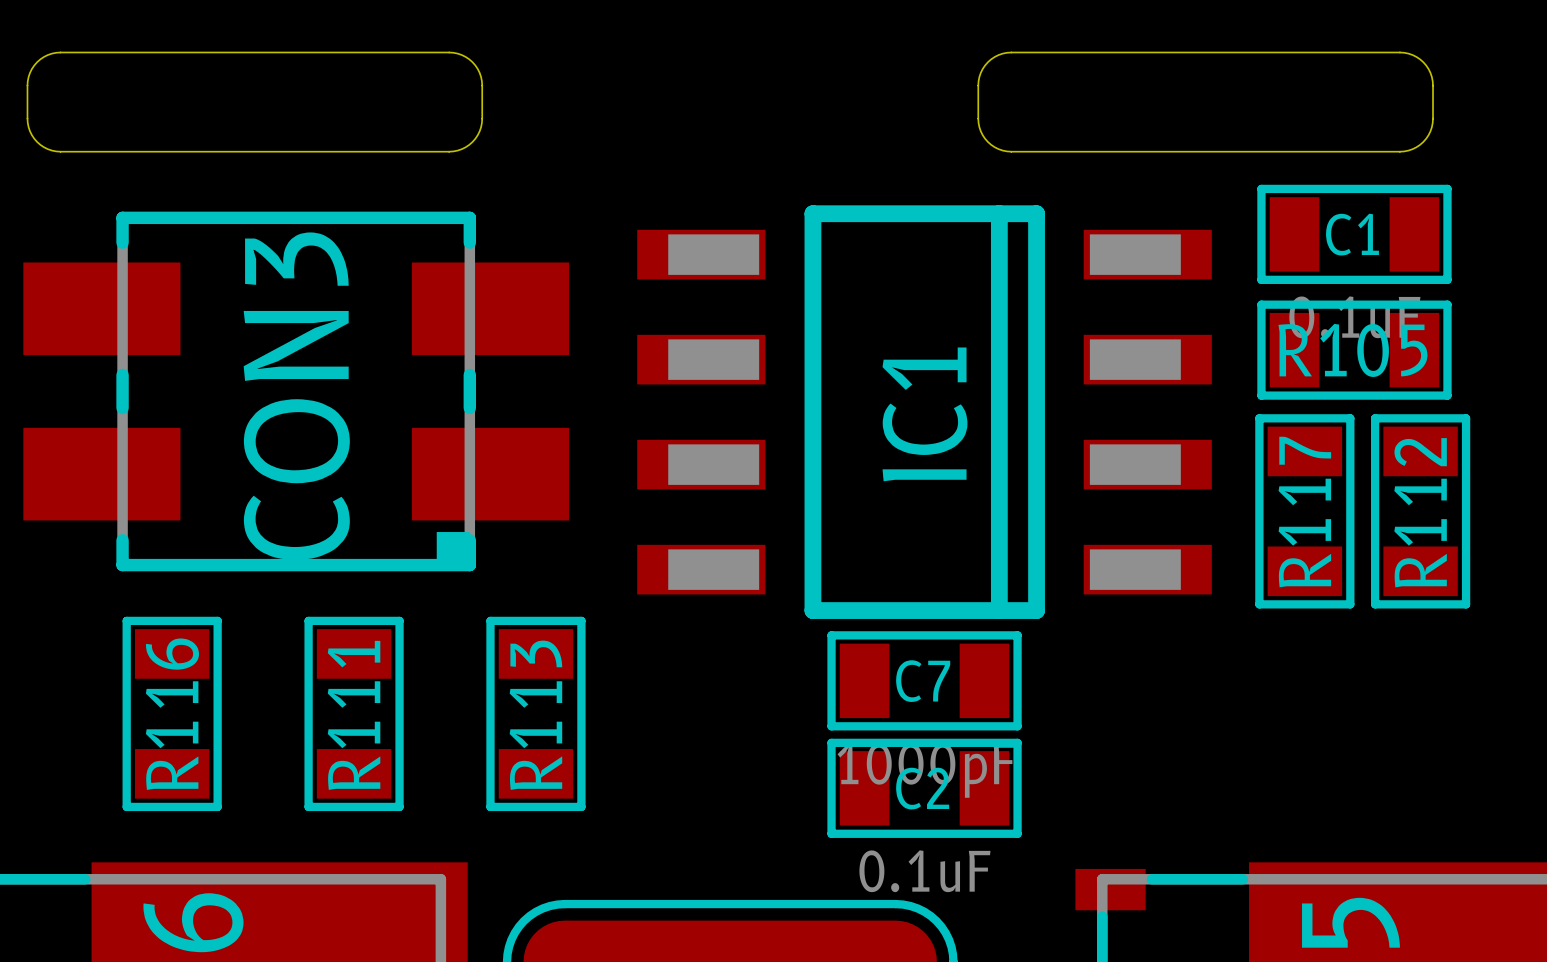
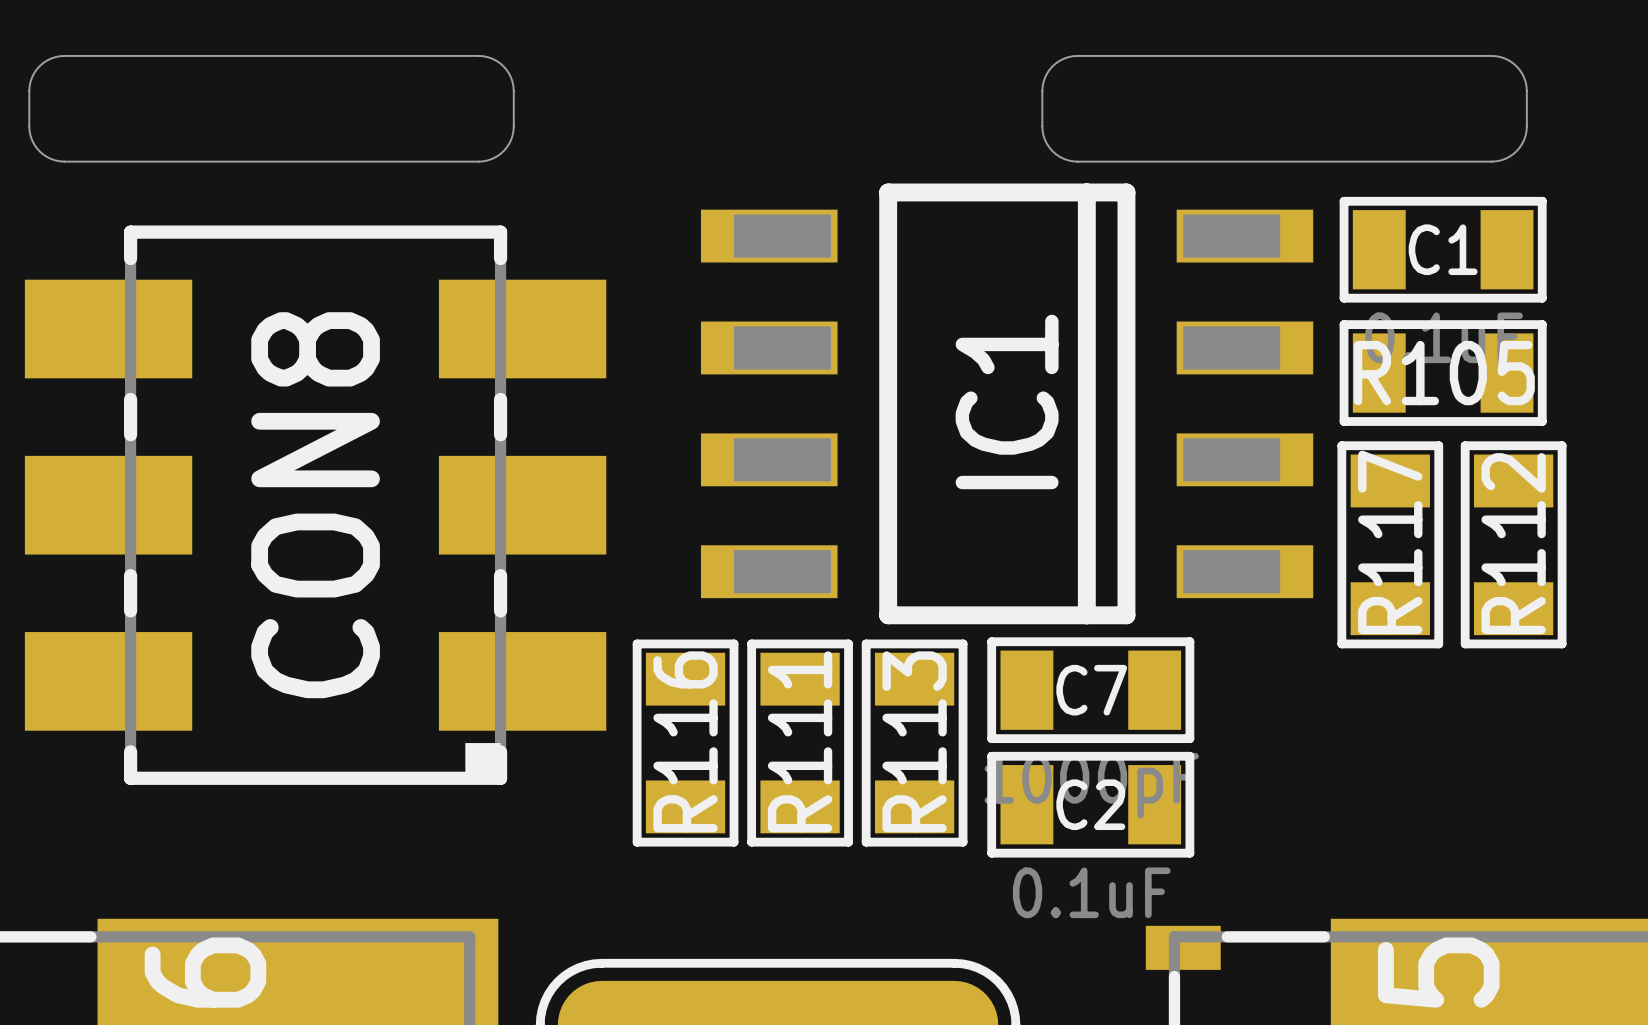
CON3: (296, 391) -> none
IC1 position: (924, 412) -> (1007, 403)
CON8: none -> (315, 505)
C7 position: (924, 680) -> (1090, 690)
R116 position: (172, 713) -> (685, 743)
R111 position: (354, 713) -> (800, 743)
R113 position: (535, 713) -> (914, 743)
C2 position: (924, 788) -> (1090, 804)

